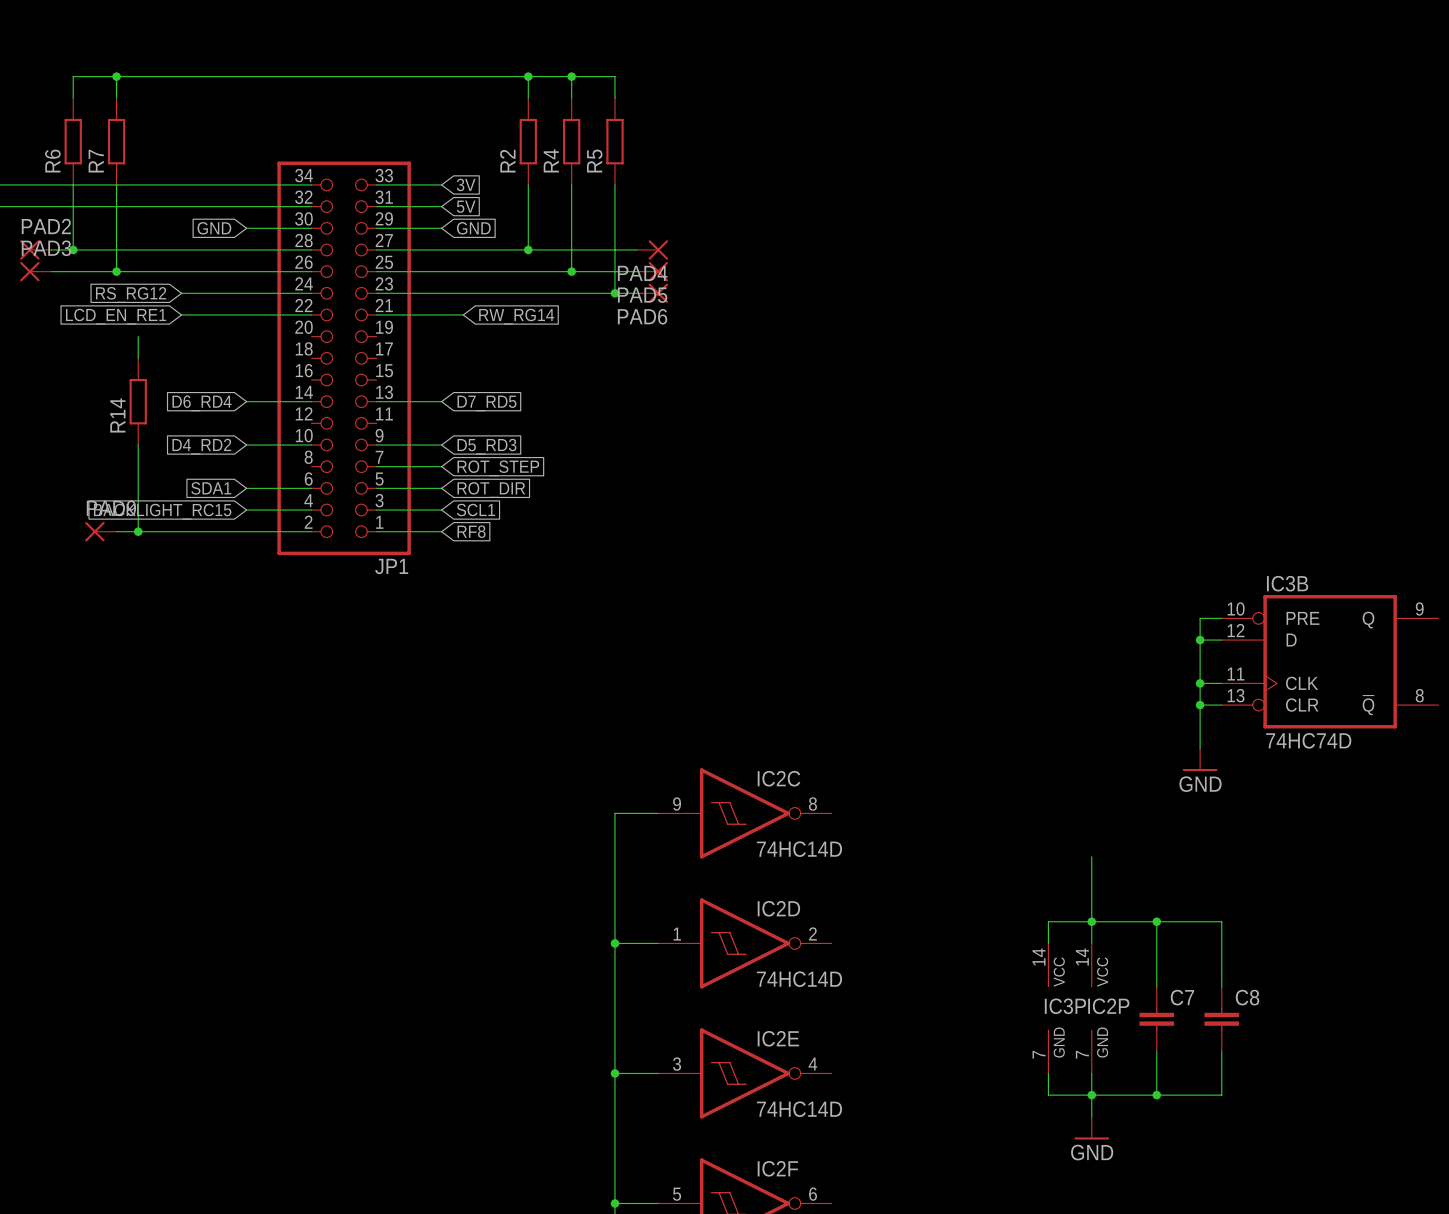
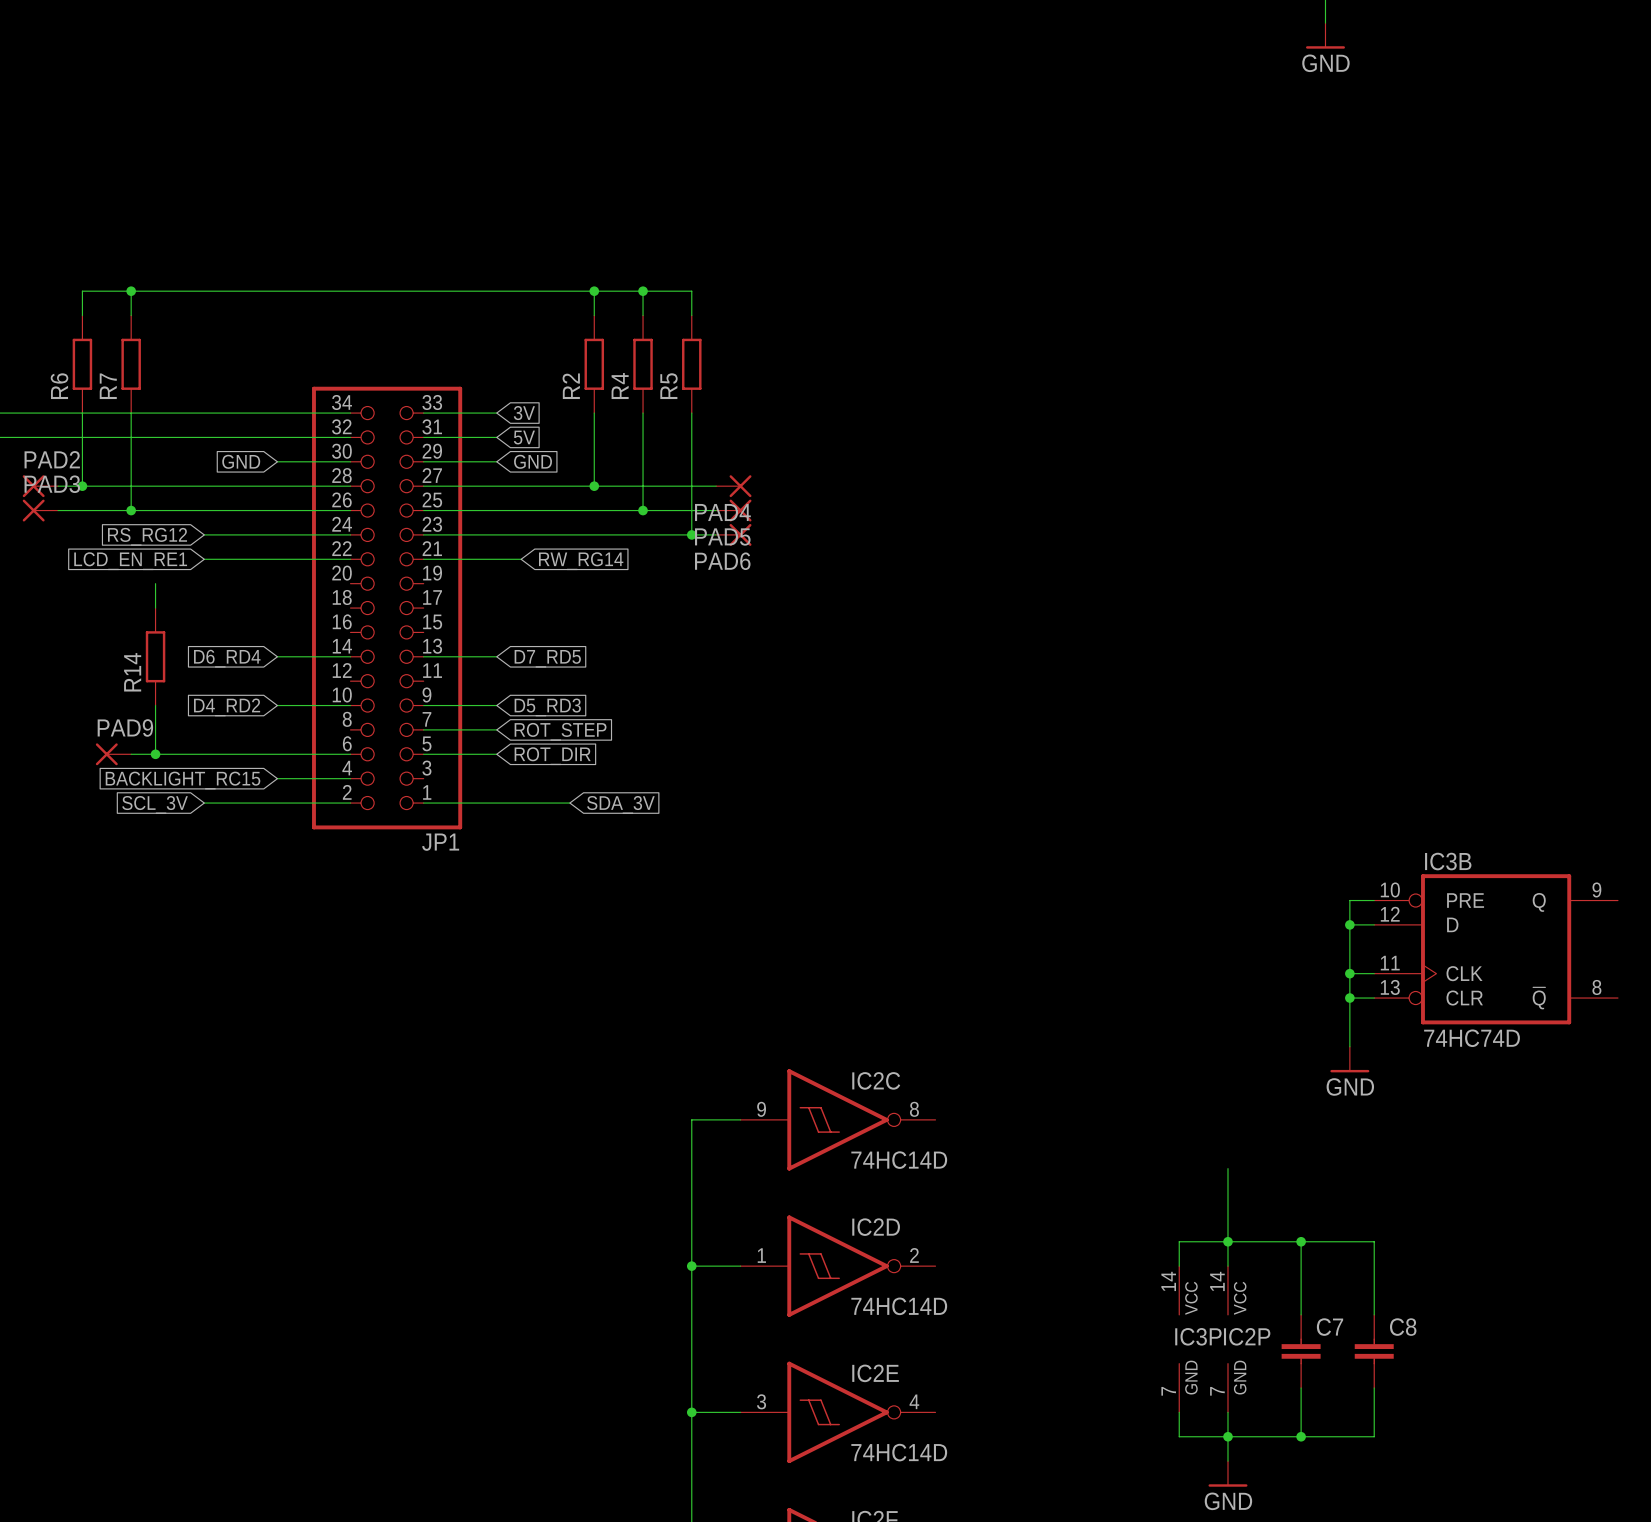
wire: none -> (131, 754) (277, 754)
wire: (138, 488) (138, 531) -> none
global label: SDA1 (211, 488) -> none
wire: (376, 510) (441, 510) -> (496, 803) (569, 803)
global label: SCL1 (476, 510) -> none
PAD9 position: (100, 531) -> (113, 754)
wire: (116, 531) (181, 531) -> none
junction position: (138, 531) -> (155, 754)
global label: RF8 (471, 531) -> none
global label: none -> SCL_3V (155, 804)
global label: none -> SDA_3V (620, 804)

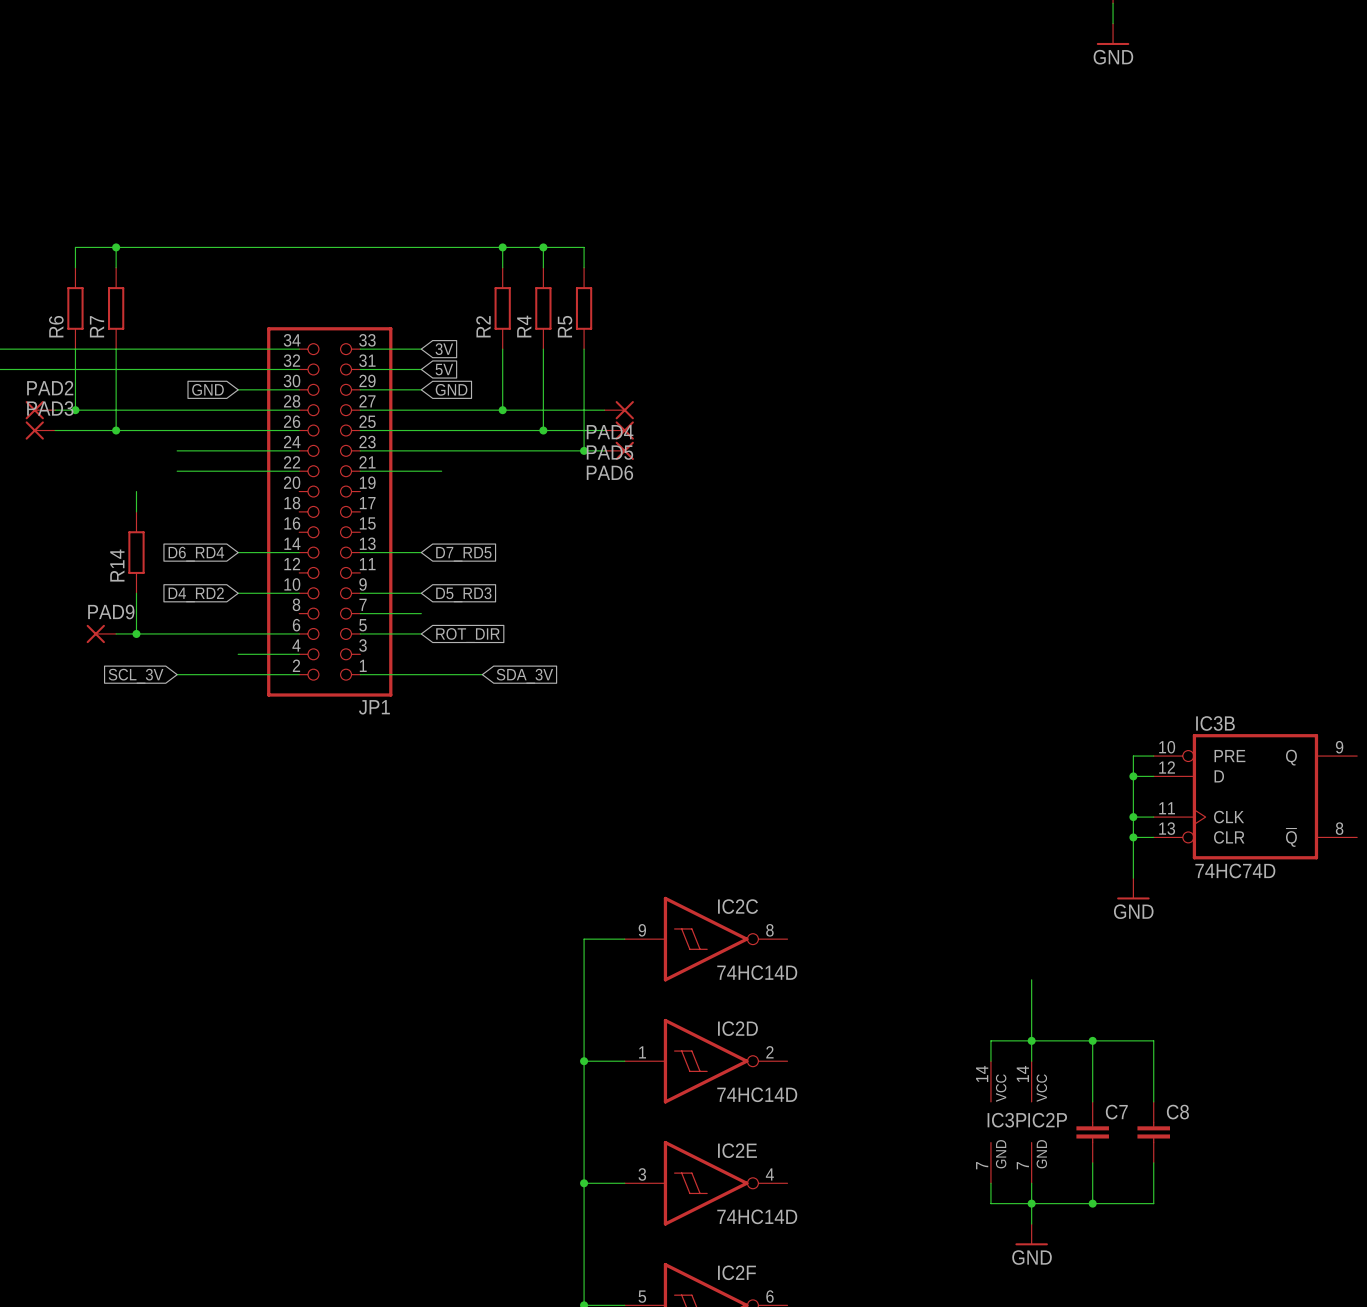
global label: RS_RG12 (147, 536) -> none
global label: LCD_EN_RE1 (130, 561) -> none
global label: RW_RG14 (581, 561) -> none
global label: ROT_STEP (560, 731) -> none
global label: BACKLIGHT_RC15 (183, 780) -> none

